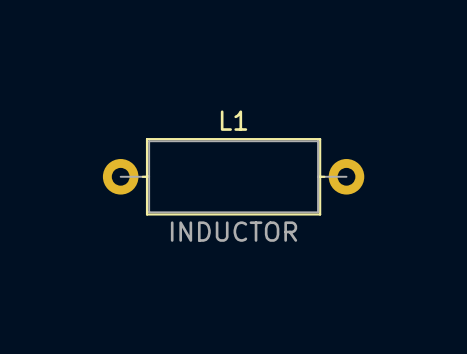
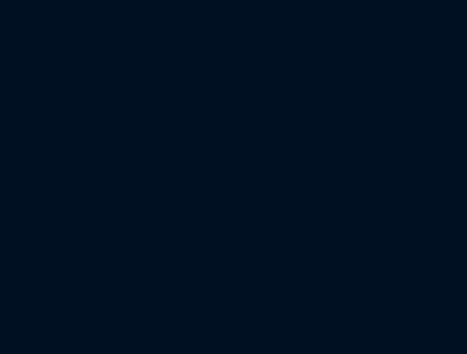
L1: INDUCTOR (233, 176) -> none

